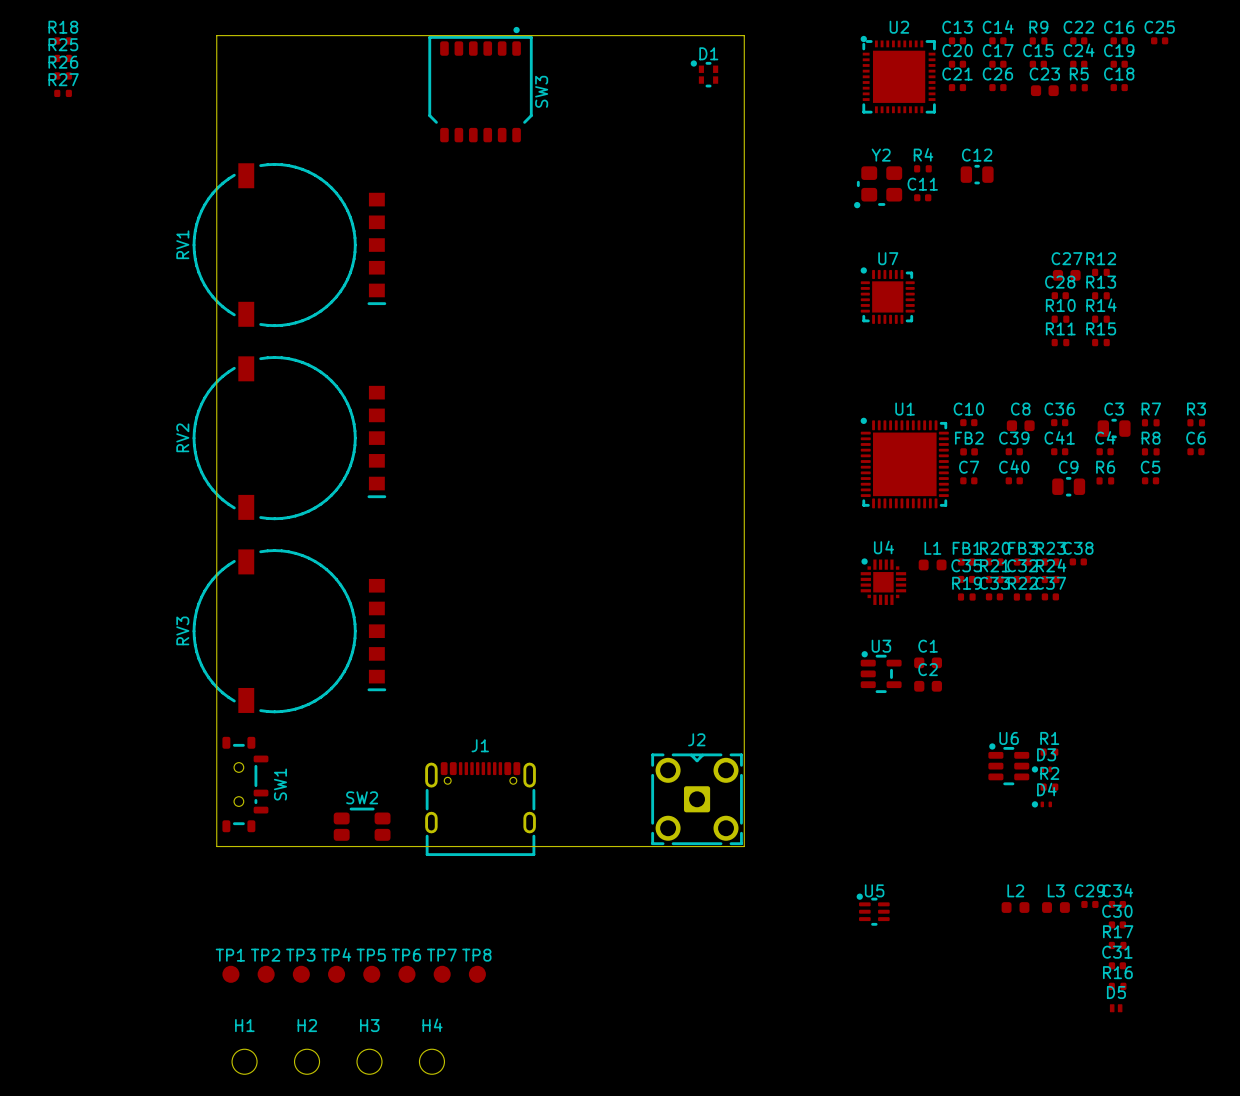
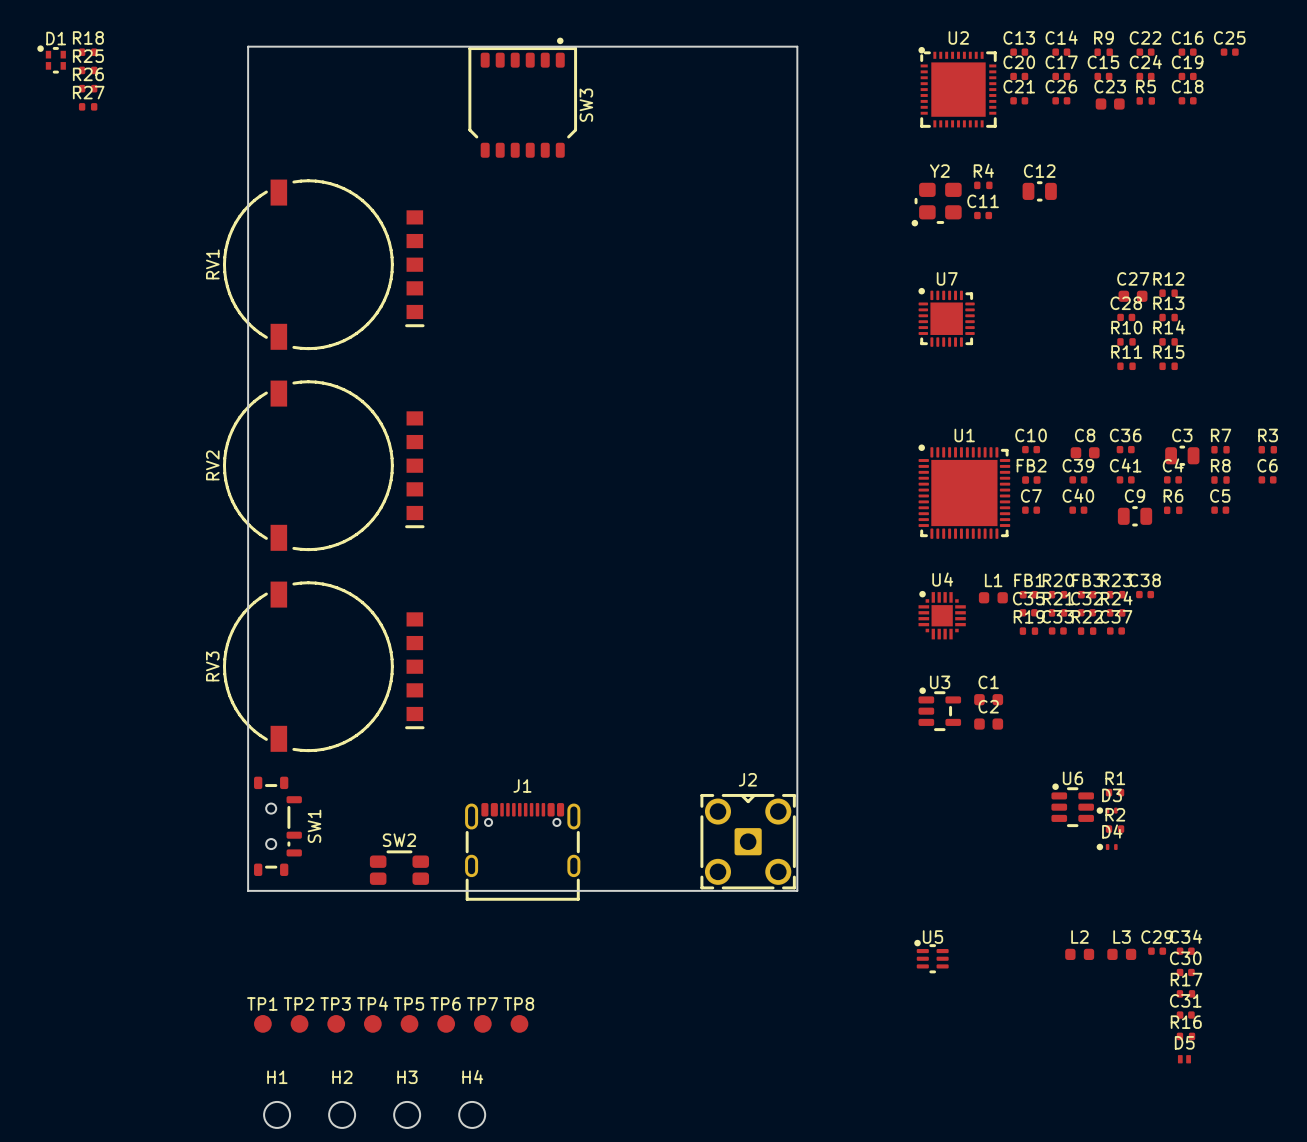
D1 position: (704, 73) -> (51, 59)

